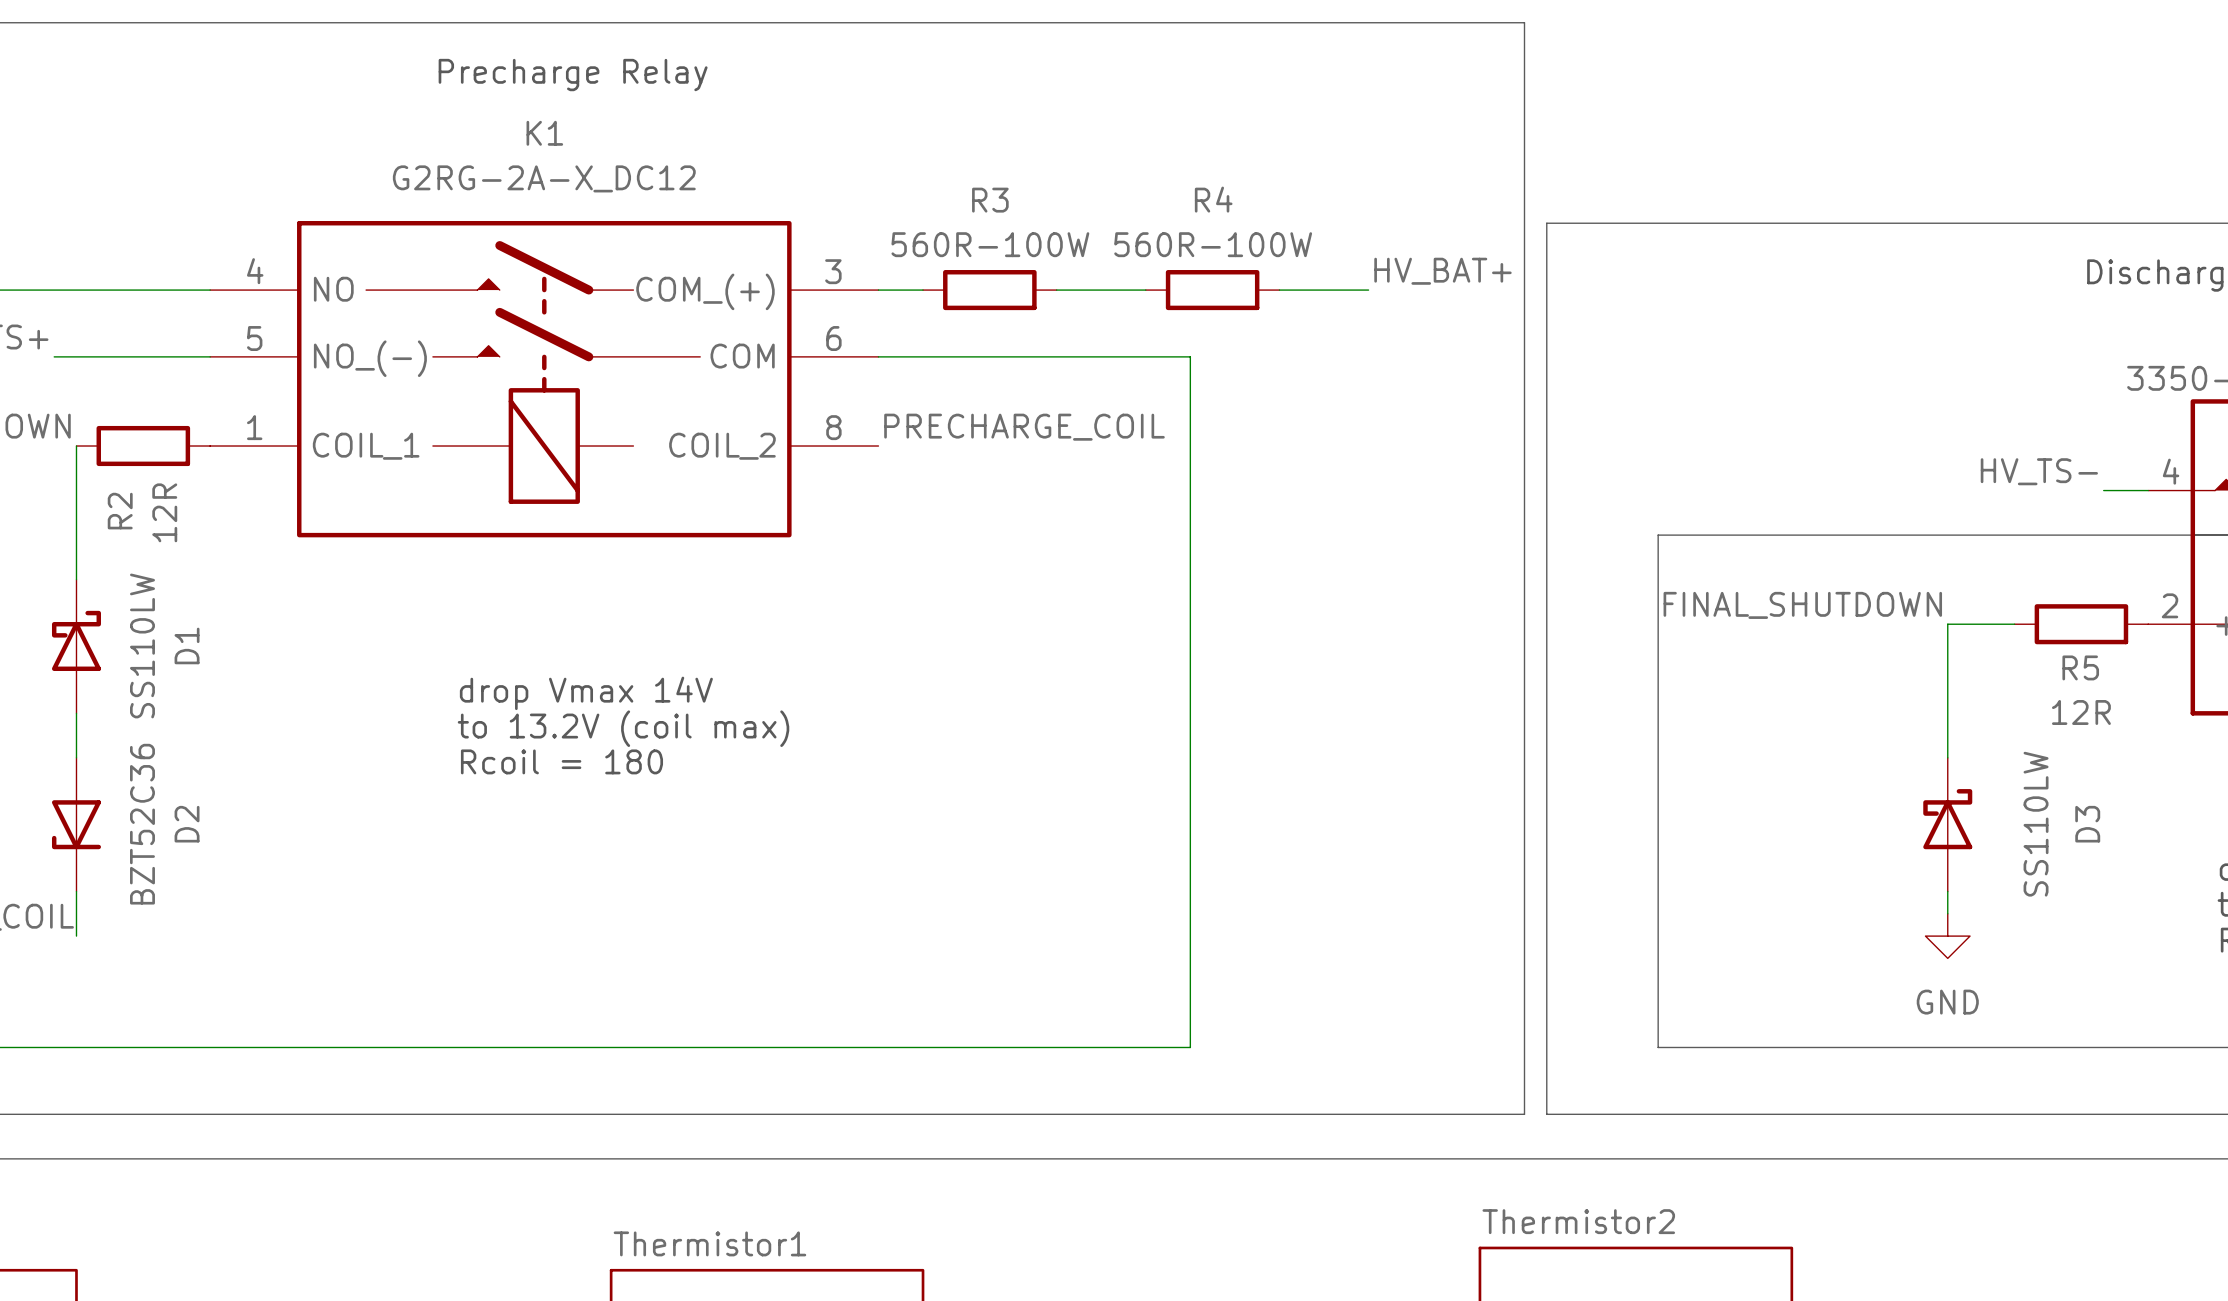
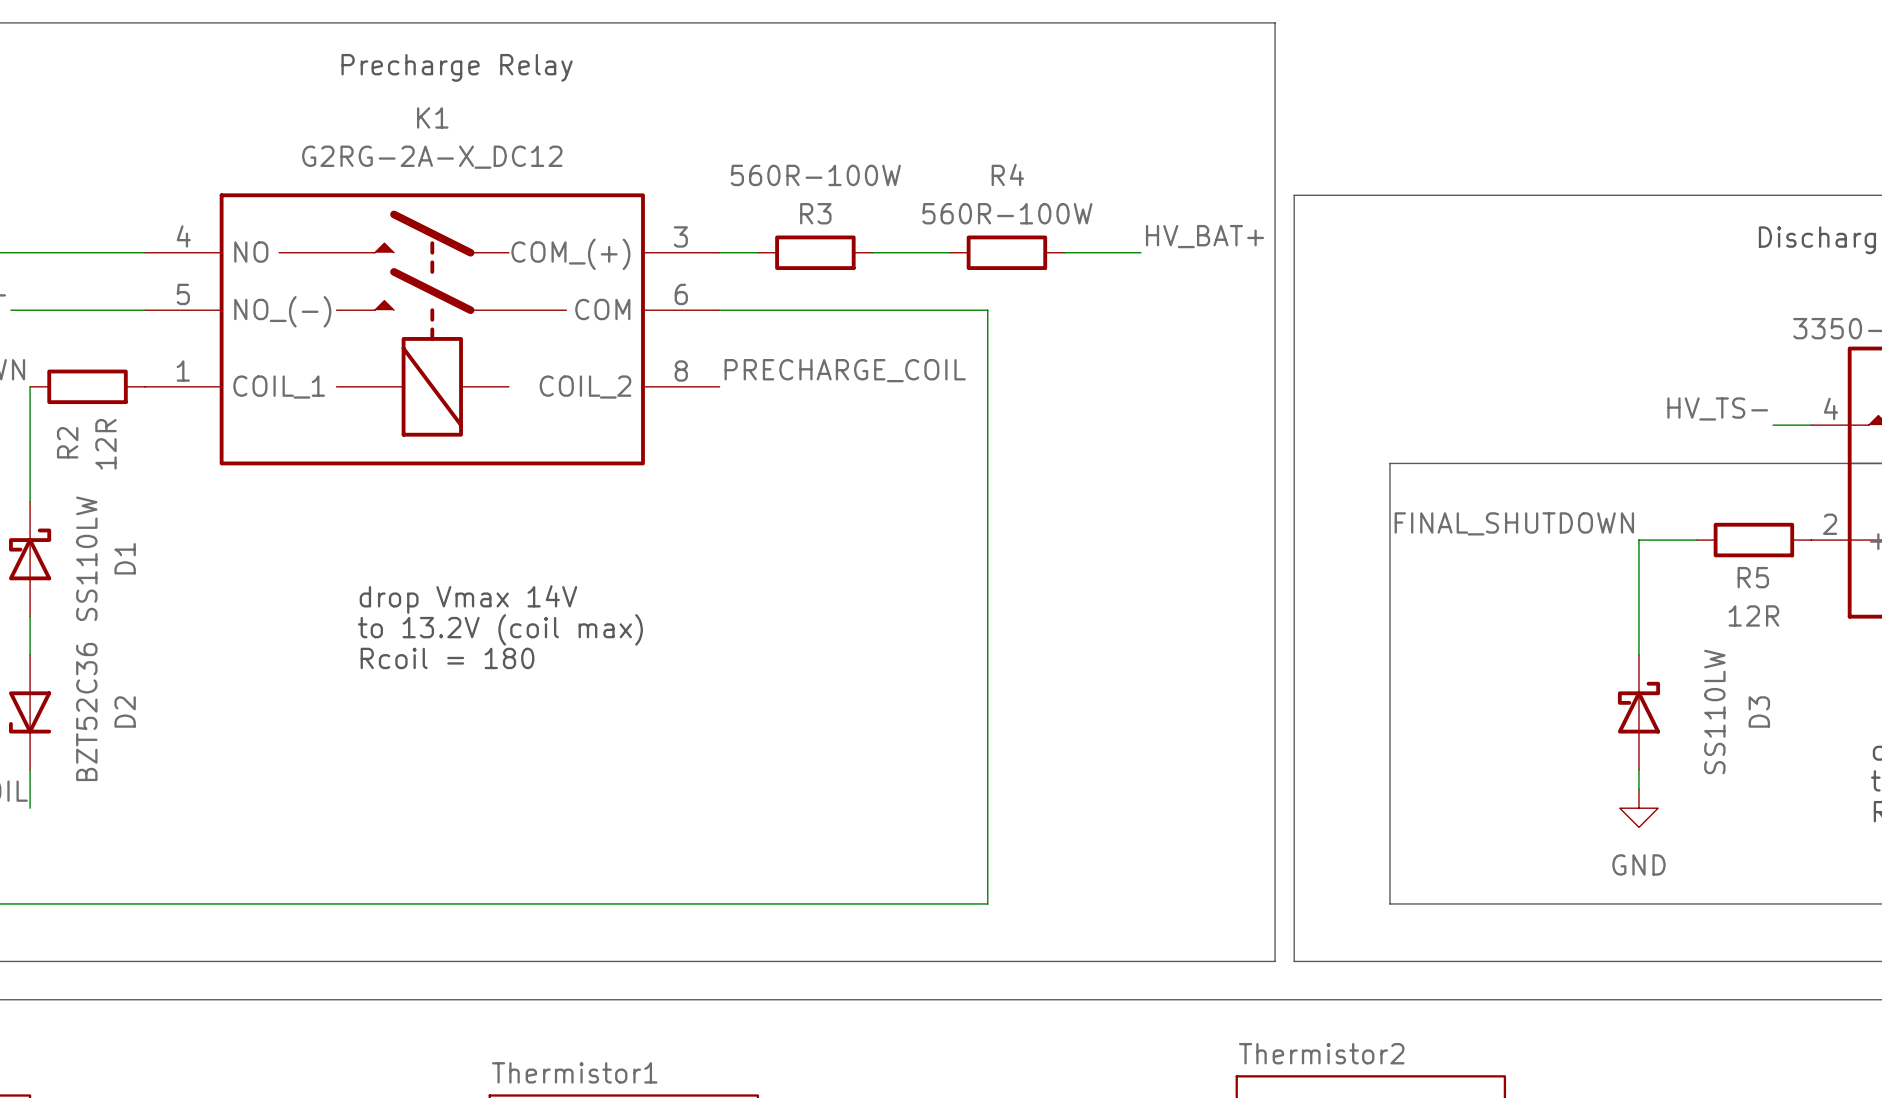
R3 name position: R3 (990, 200) -> R3 (815, 213)
R3 value position: 560R-100W (990, 244) -> 560R-100W (815, 175)

